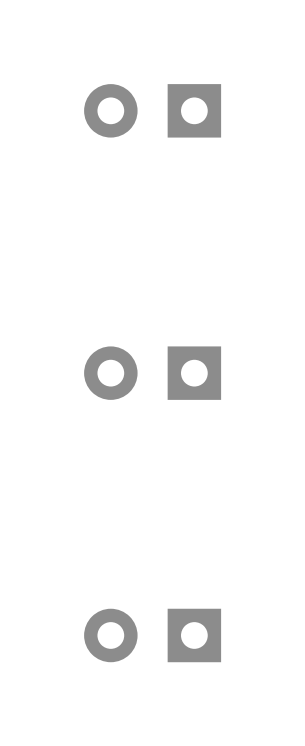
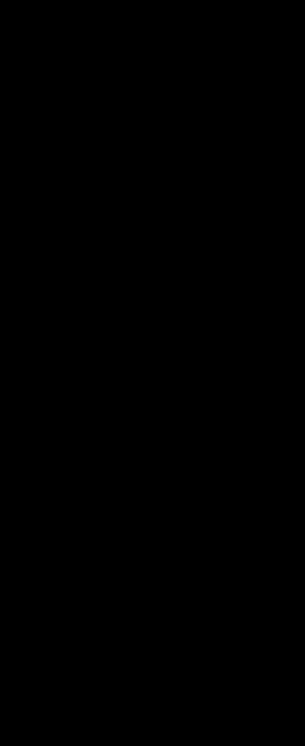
part: (152, 110) -> none
part: (152, 373) -> none
part: (152, 635) -> none

